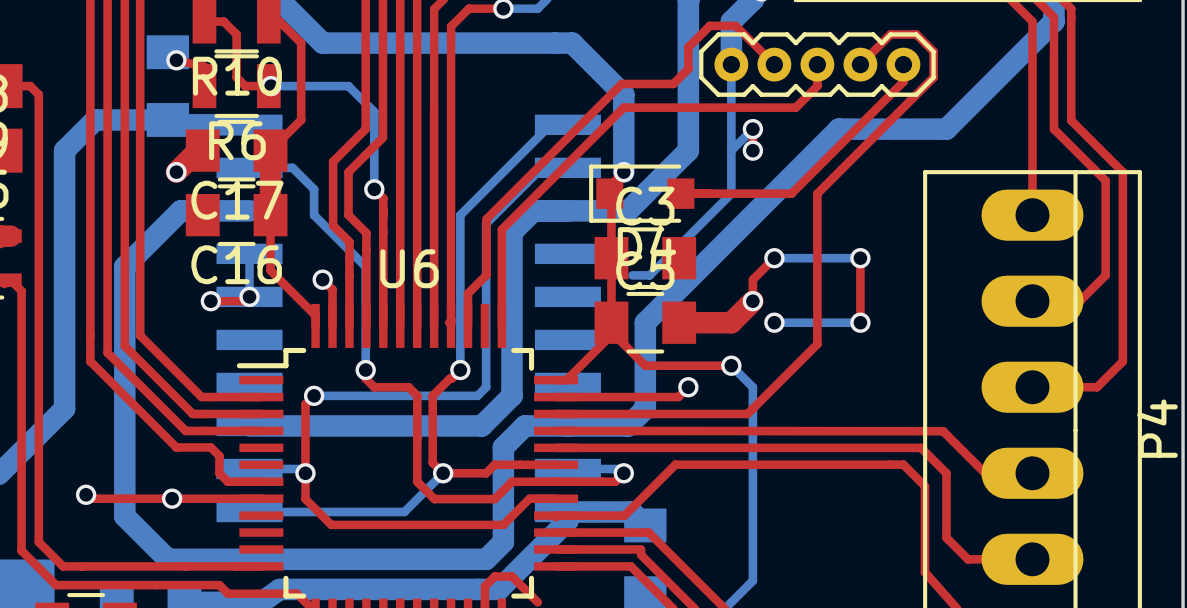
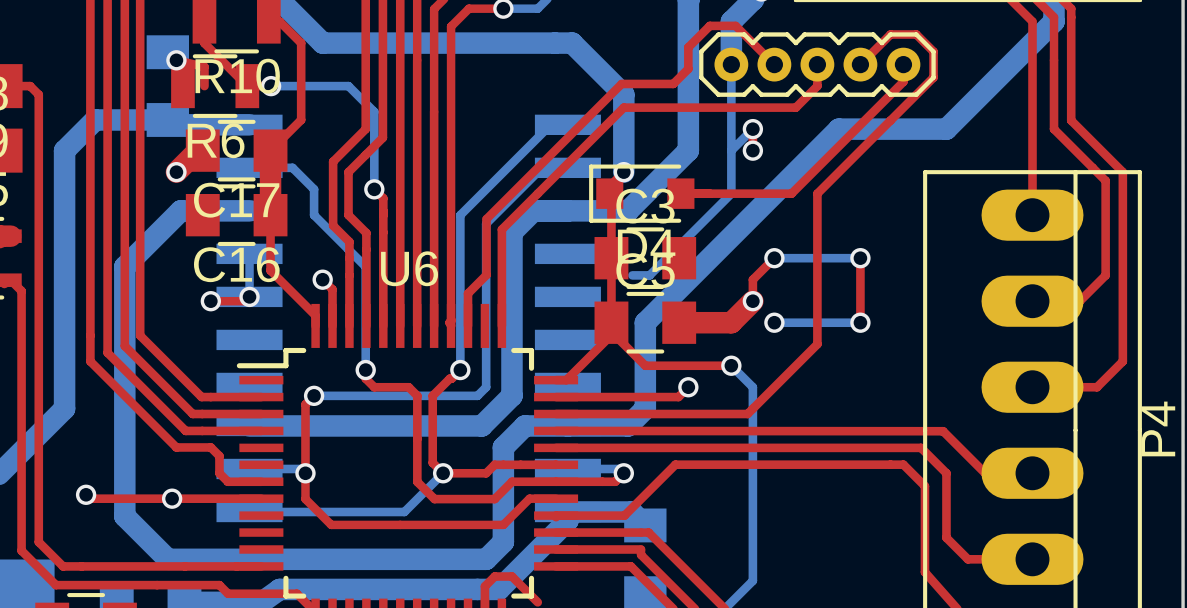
top track: (204, 21) (223, 21) (236, 34) (236, 77) (247, 86) -> (204, 21) (204, 43) (247, 86)
R6 position: (236, 86) -> (215, 86)

